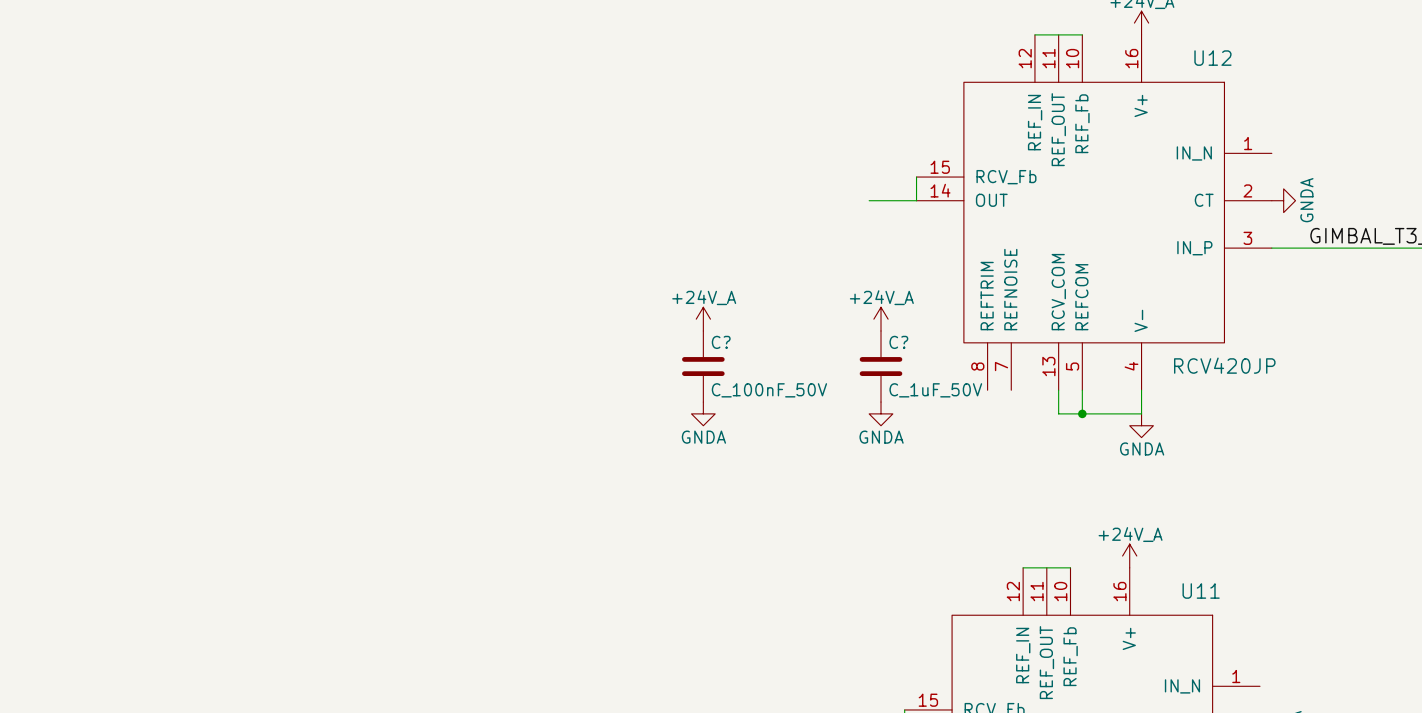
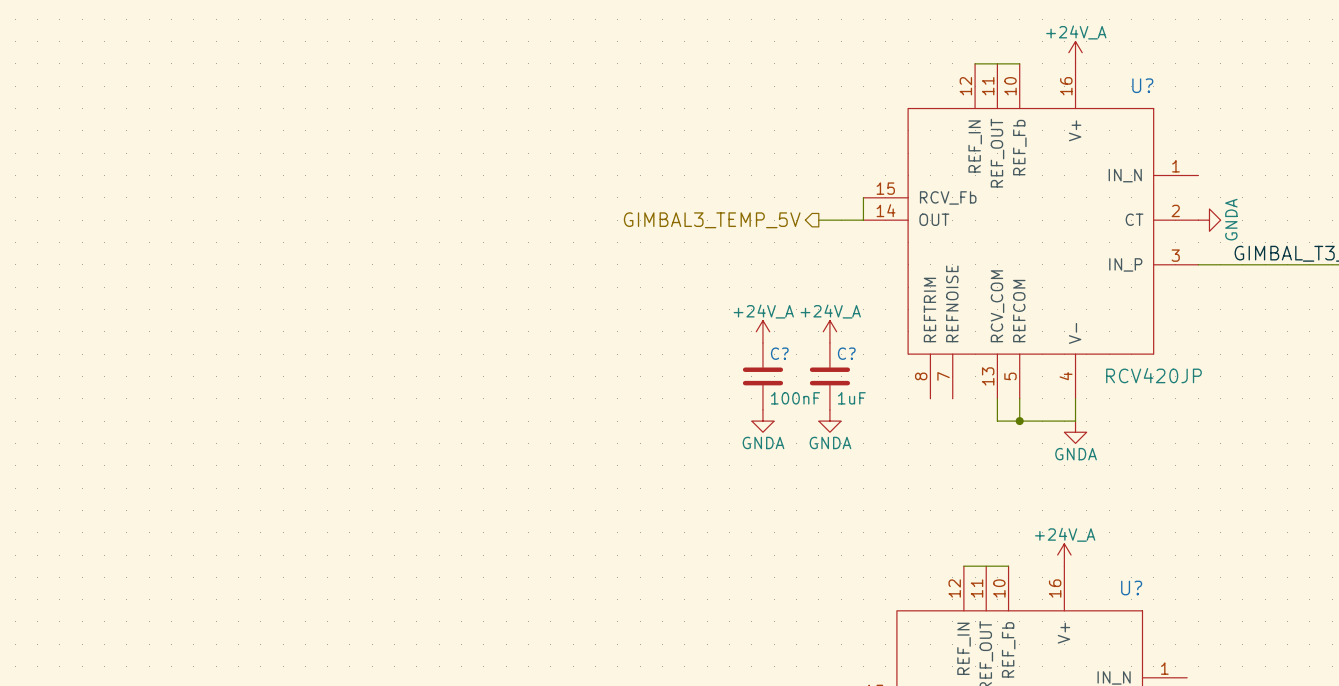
U12 name: U12 (1212, 58) -> U? (1142, 85)
hierarchical label: none -> GIMBAL3_TEMP_5V (712, 220)
power symbol position: +24V_A (703, 319) -> +24V_A (762, 331)
C?: C_100nF_50V (703, 366) -> none
C?: none -> 100nF (762, 376)
C? value: C_1uF_50V (935, 390) -> 1uF (851, 398)
power symbol position: GNDA (703, 413) -> GNDA (762, 421)
U11 name: U11 (1201, 591) -> U? (1131, 588)

